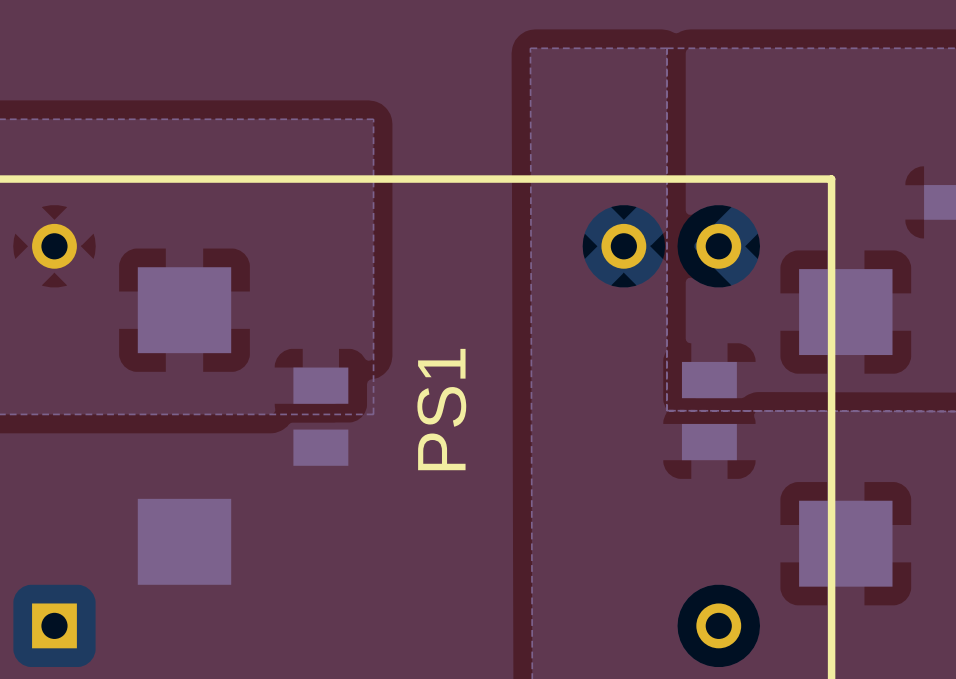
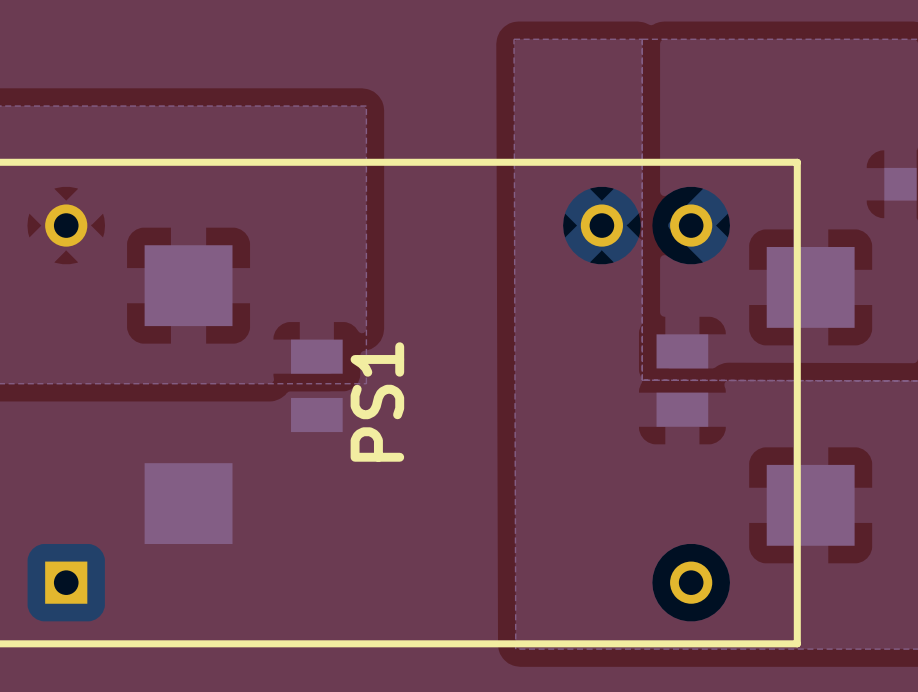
PS1 name position: PS1 (441, 409) -> PS1 (377, 401)

